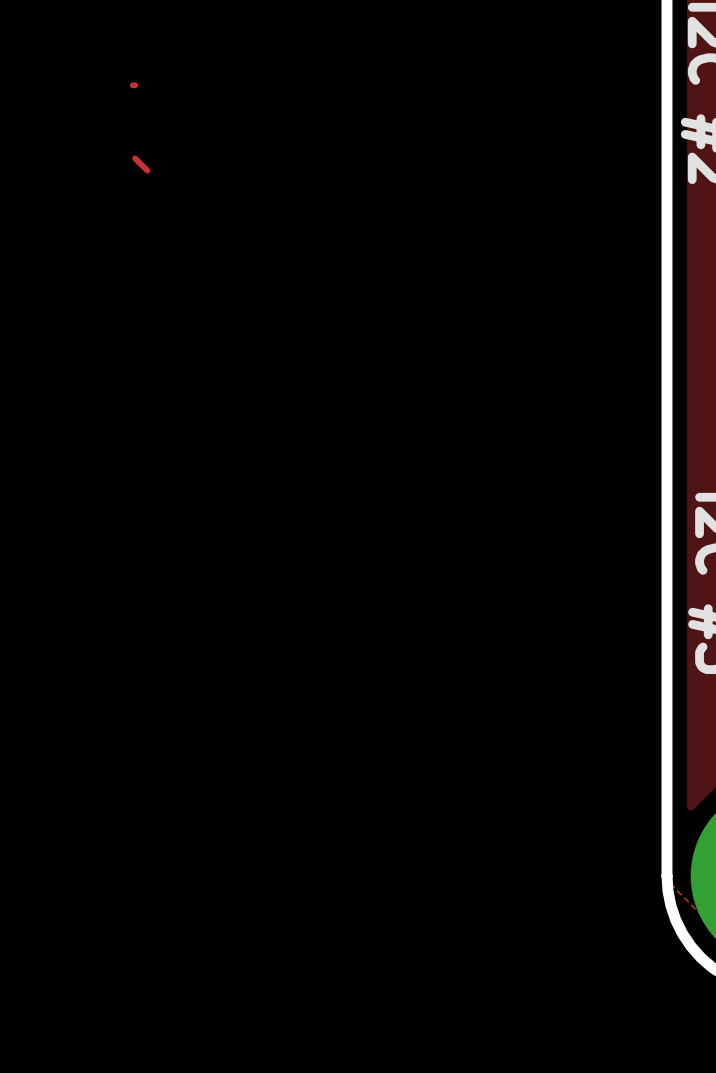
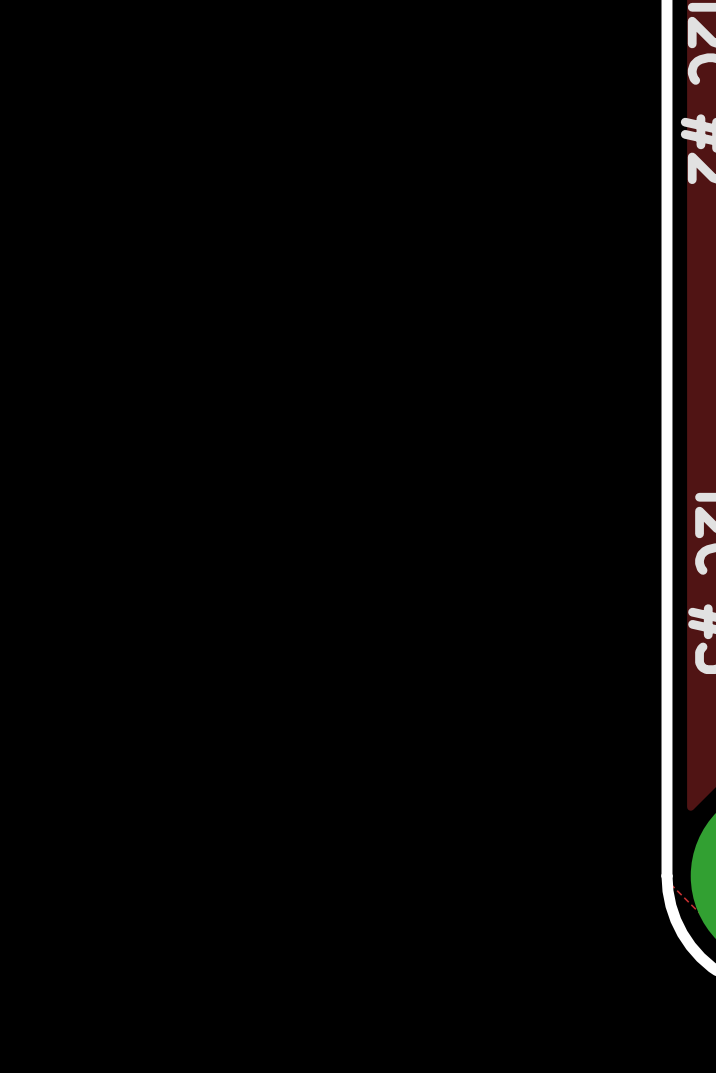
track: (132, 85) (135, 85) -> none
track: (135, 158) (147, 170) -> none

